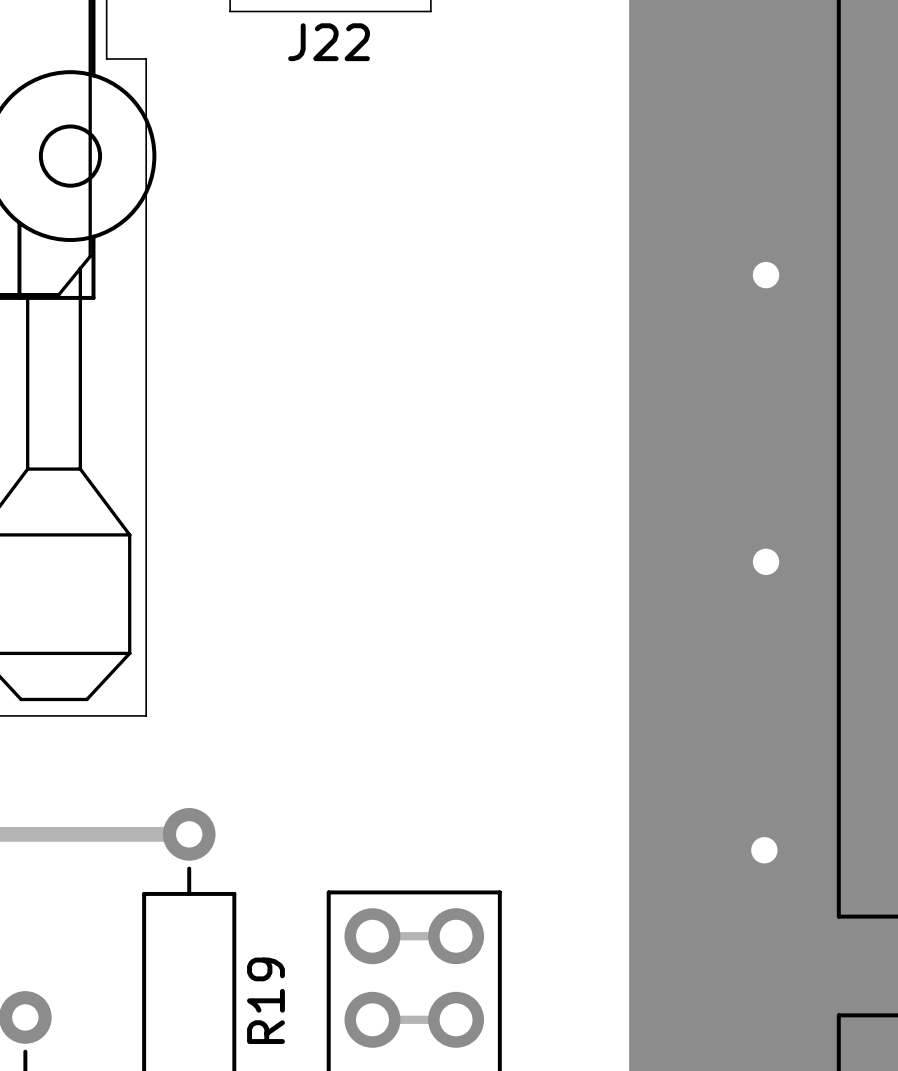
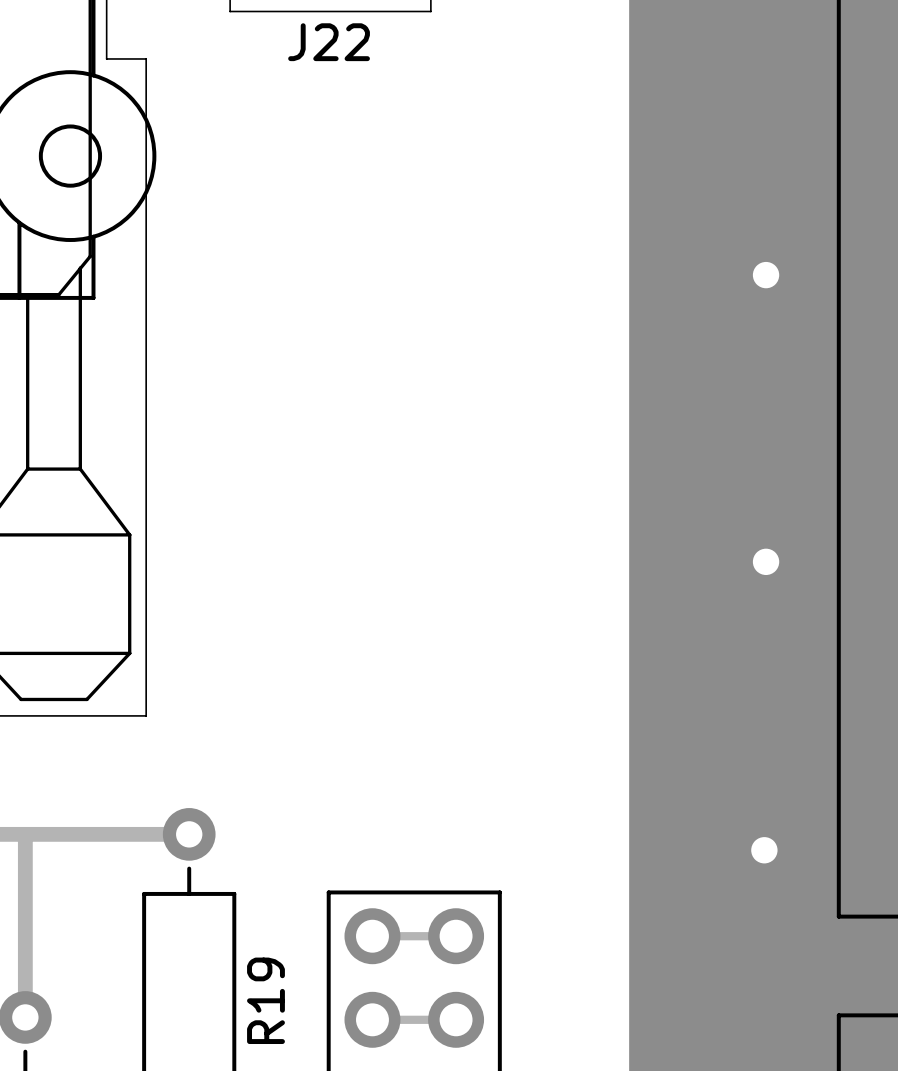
track: none -> (25, 834) (25, 1017)

